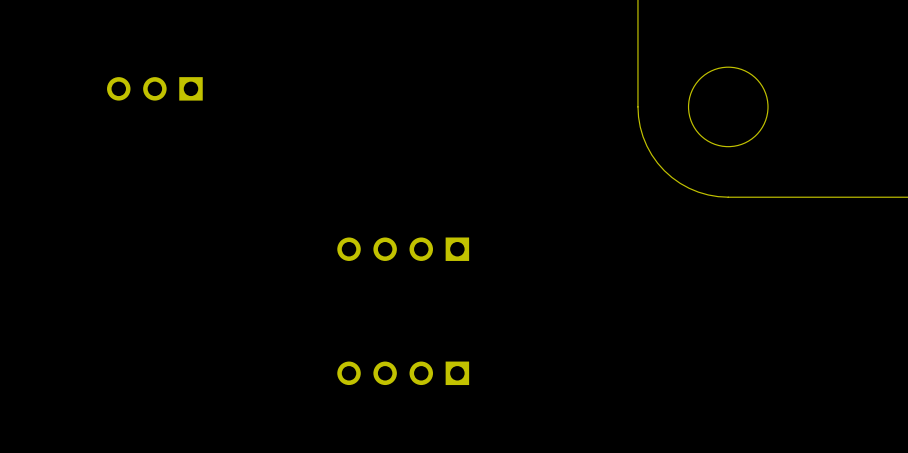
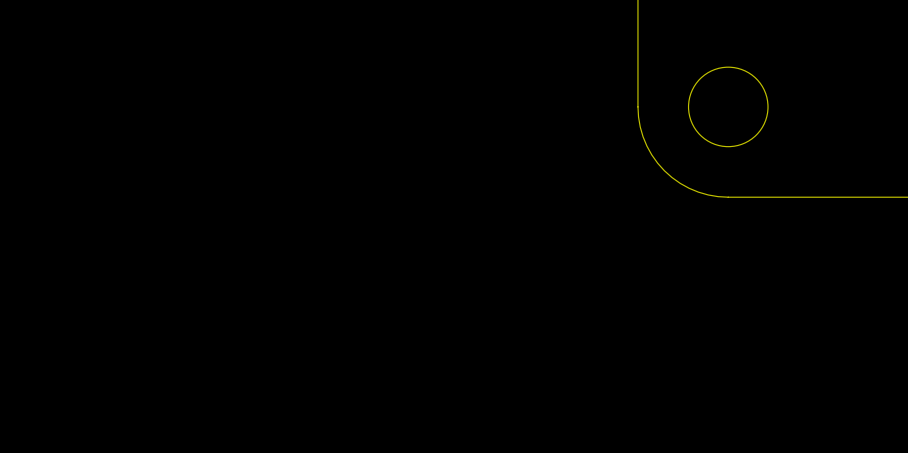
part: (154, 88) -> none
part: (403, 249) -> none
part: (403, 373) -> none

